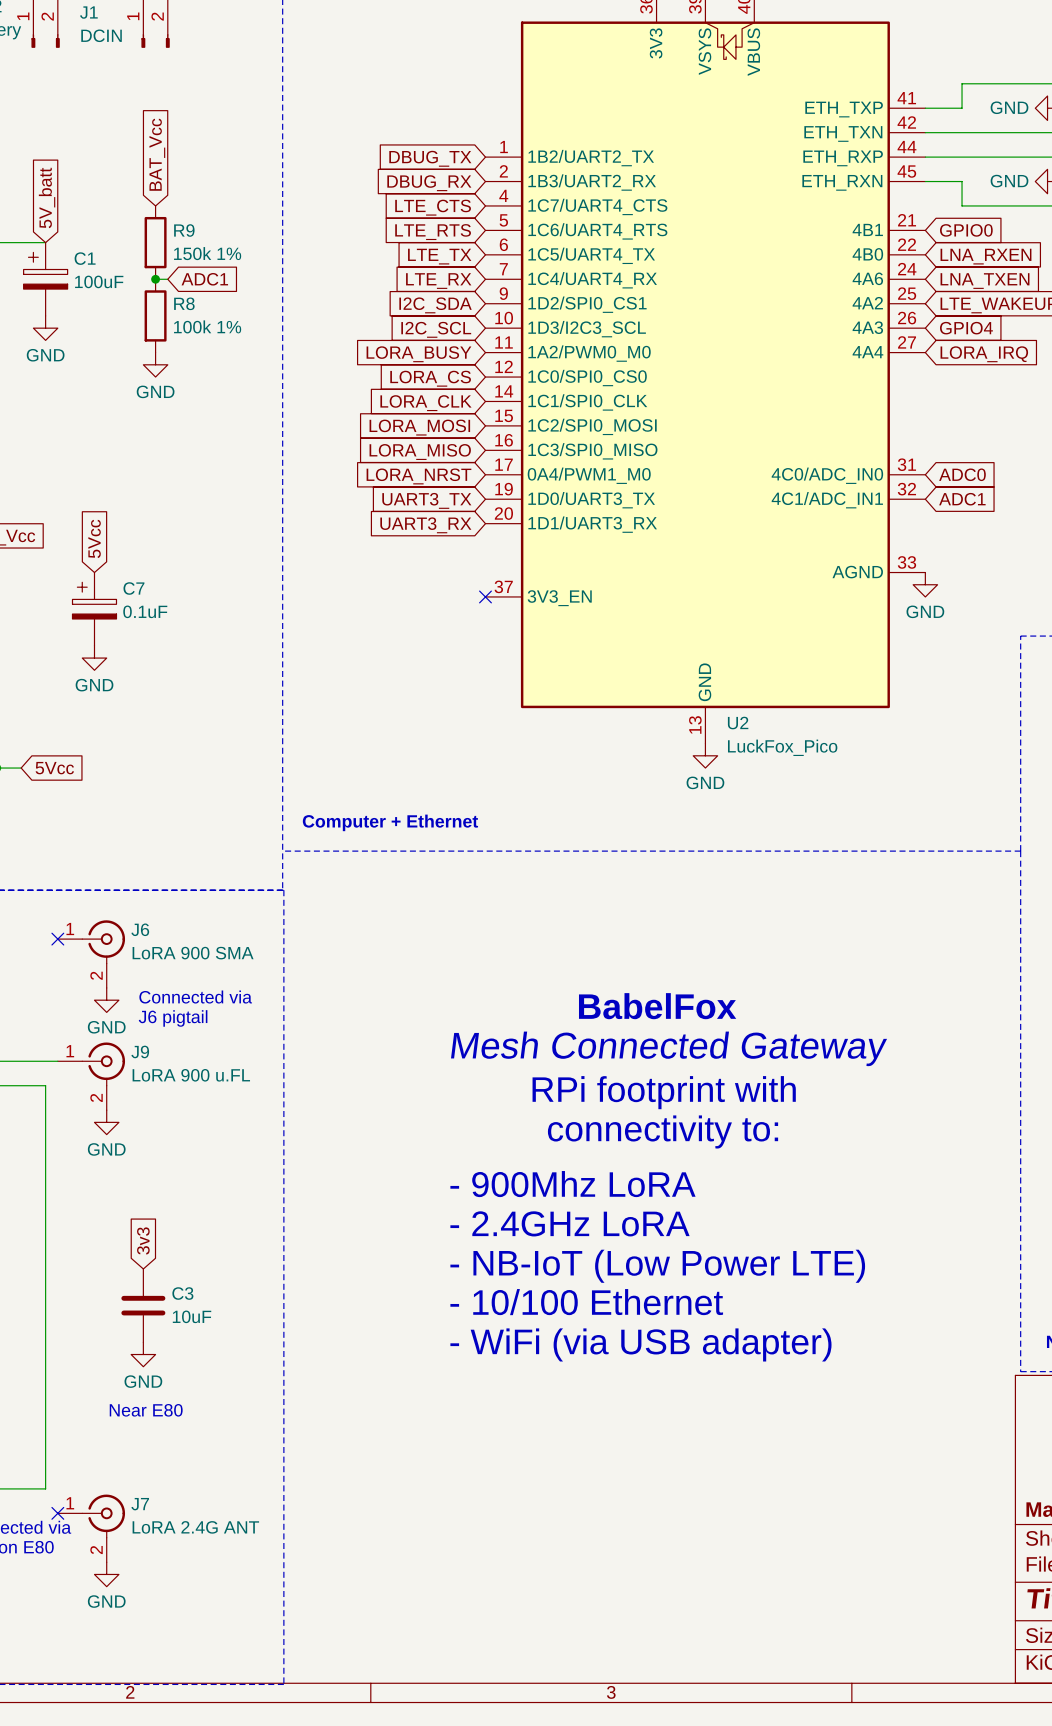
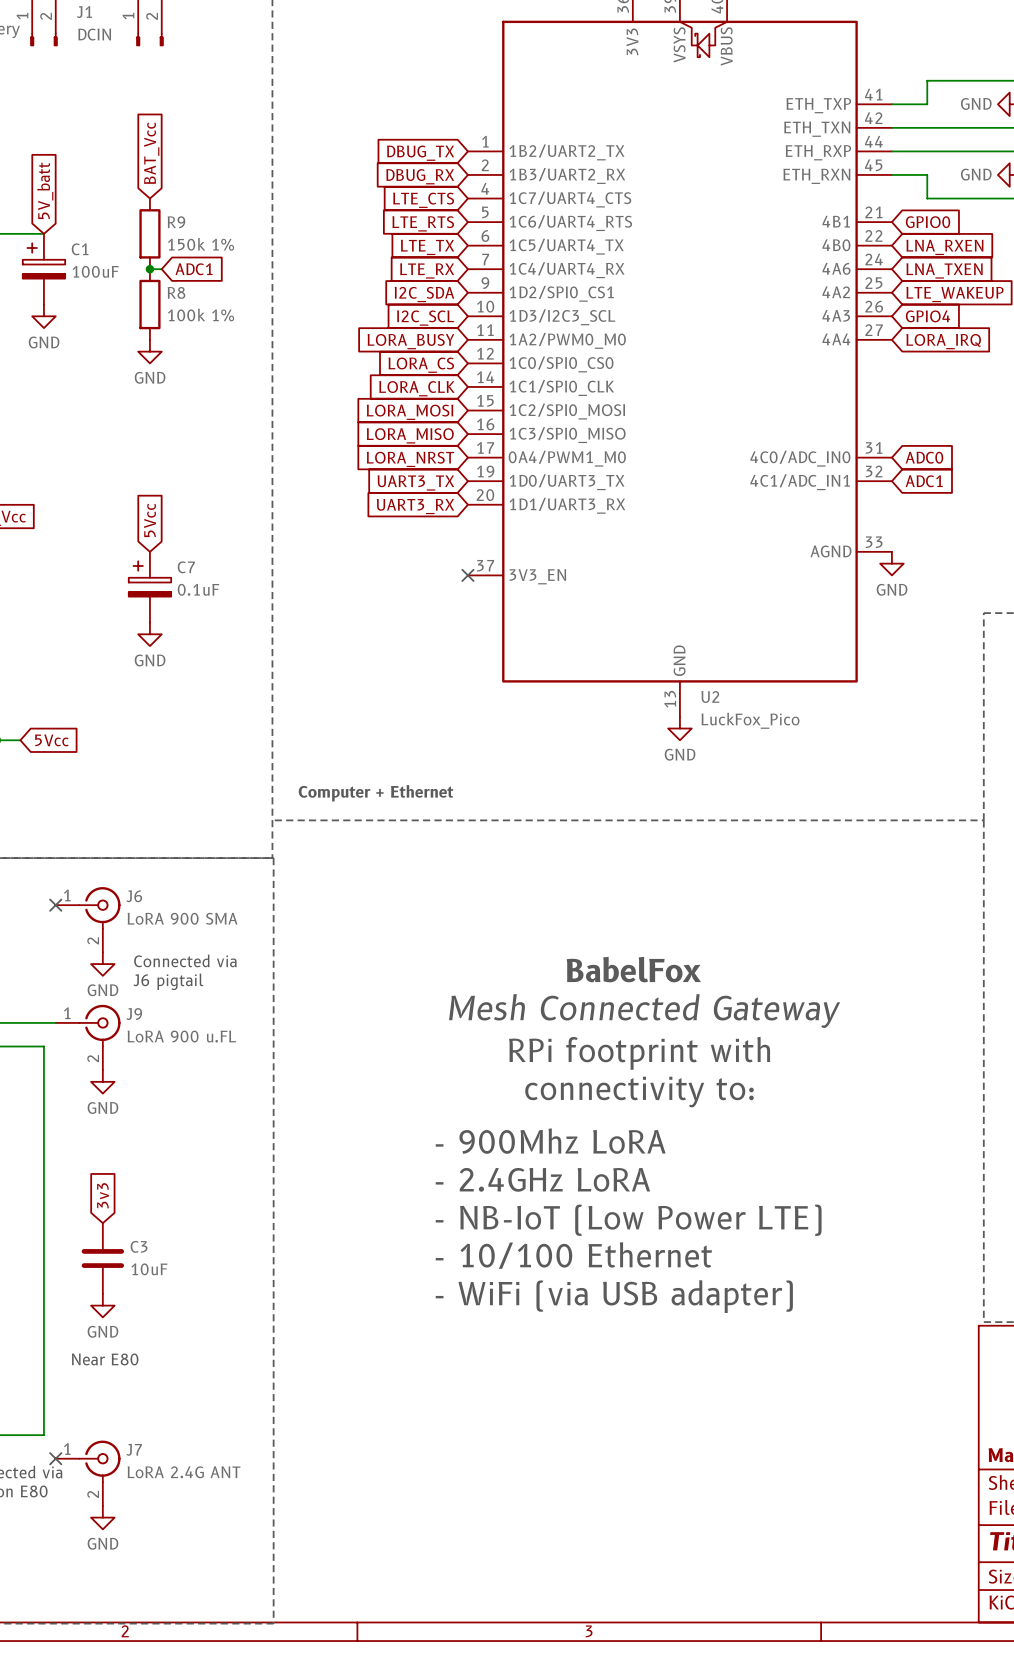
global label position: 5Vcc (94, 538) -> 5Vcc (150, 520)
C7 position: (94, 609) -> (149, 587)
power symbol position: GND (94, 658) -> GND (149, 634)
global label position: 3v3 (143, 1240) -> 3v3 (103, 1195)
C3 position: (143, 1305) -> (102, 1258)
power symbol position: GND (143, 1354) -> GND (102, 1305)
text position: Near E80 (146, 1410) -> Near E80 (105, 1359)

